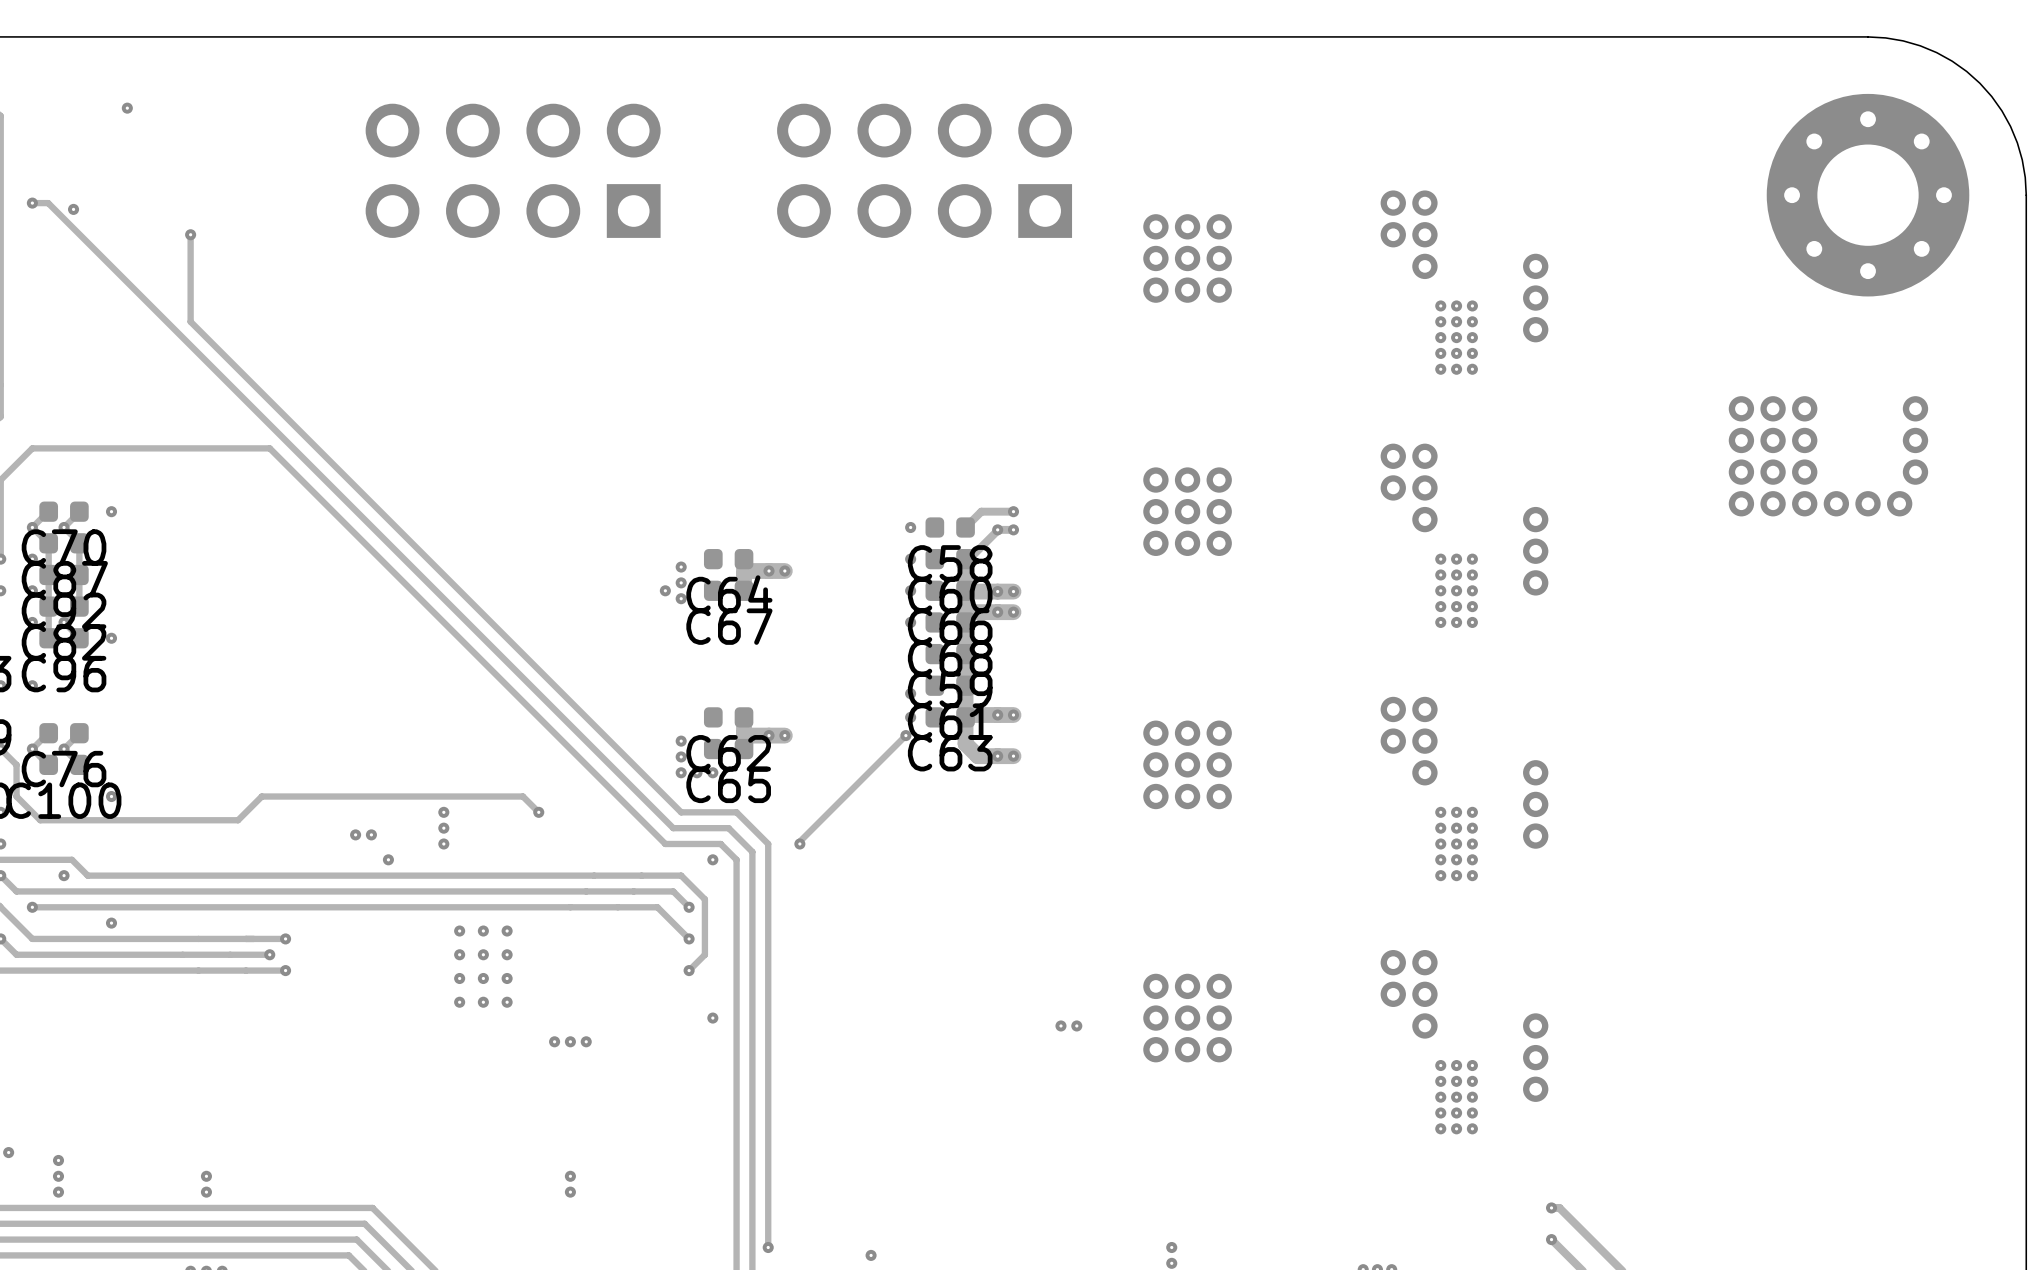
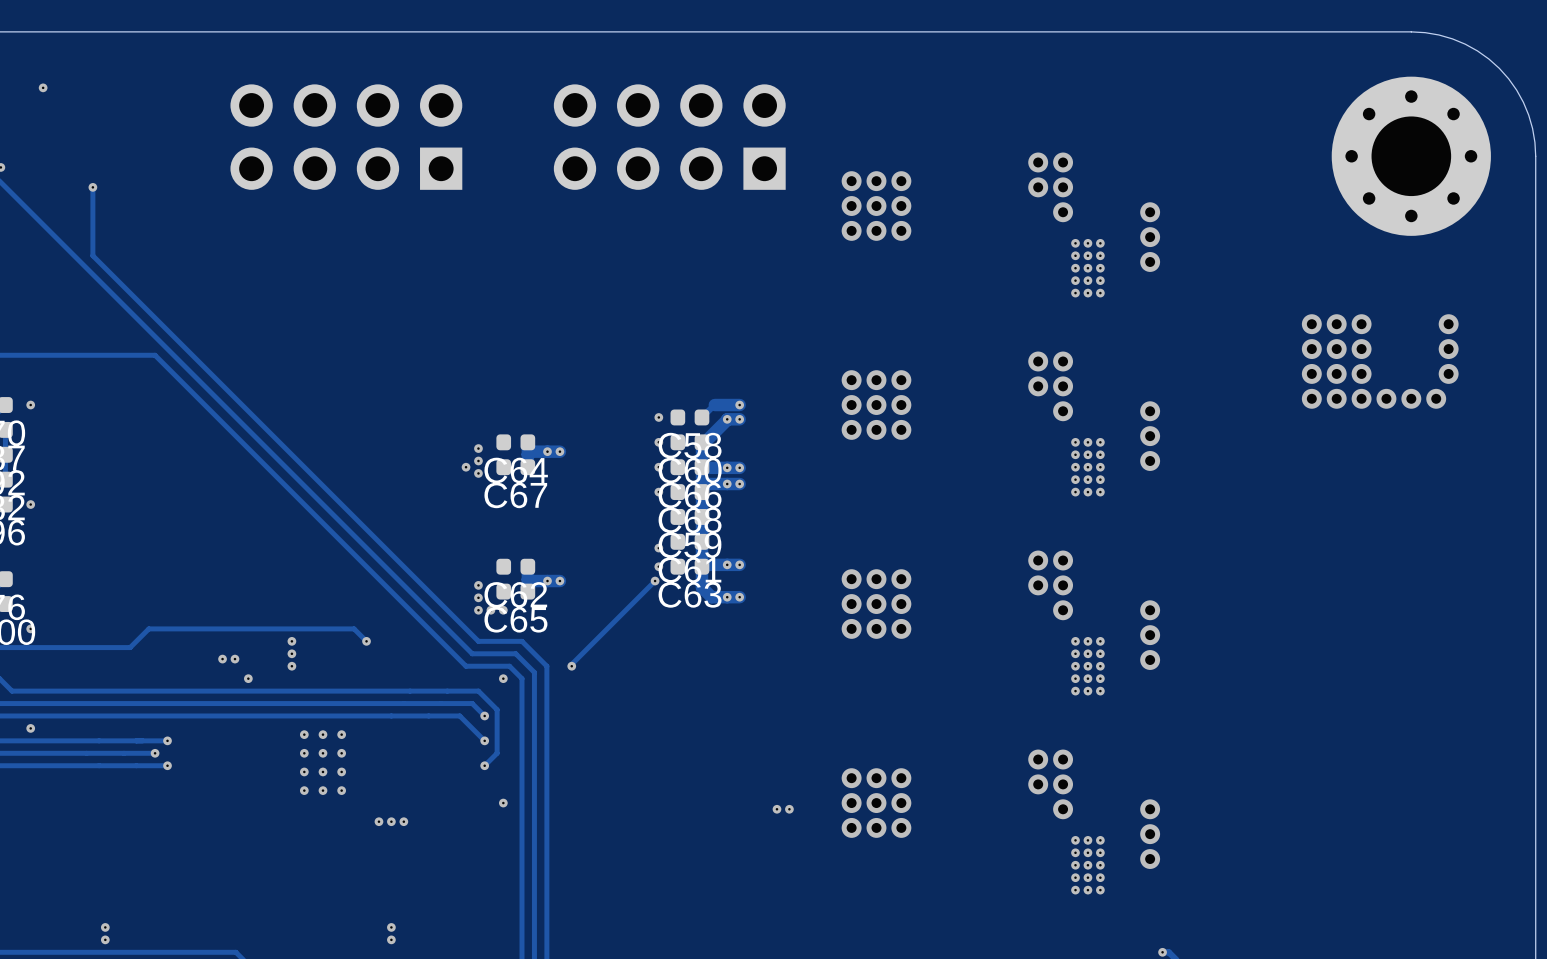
track width: thin (1013, 511) (981, 511) -> thick (739, 405) (714, 405)
track width: thin (1013, 529) (997, 529) (969, 559) -> thick (739, 419) (727, 419) (704, 442)

